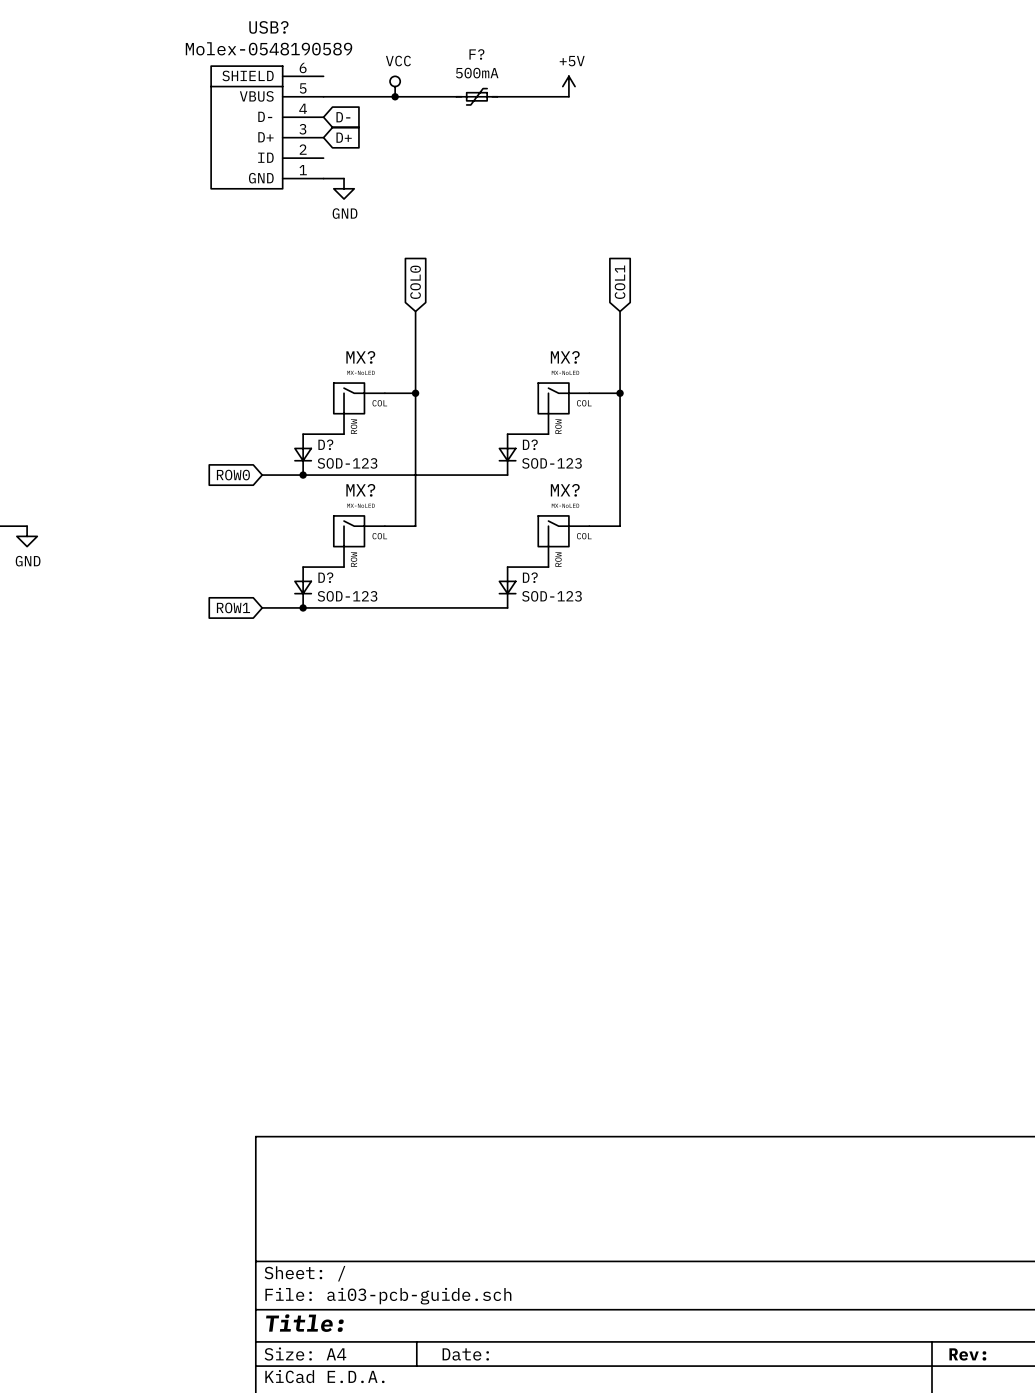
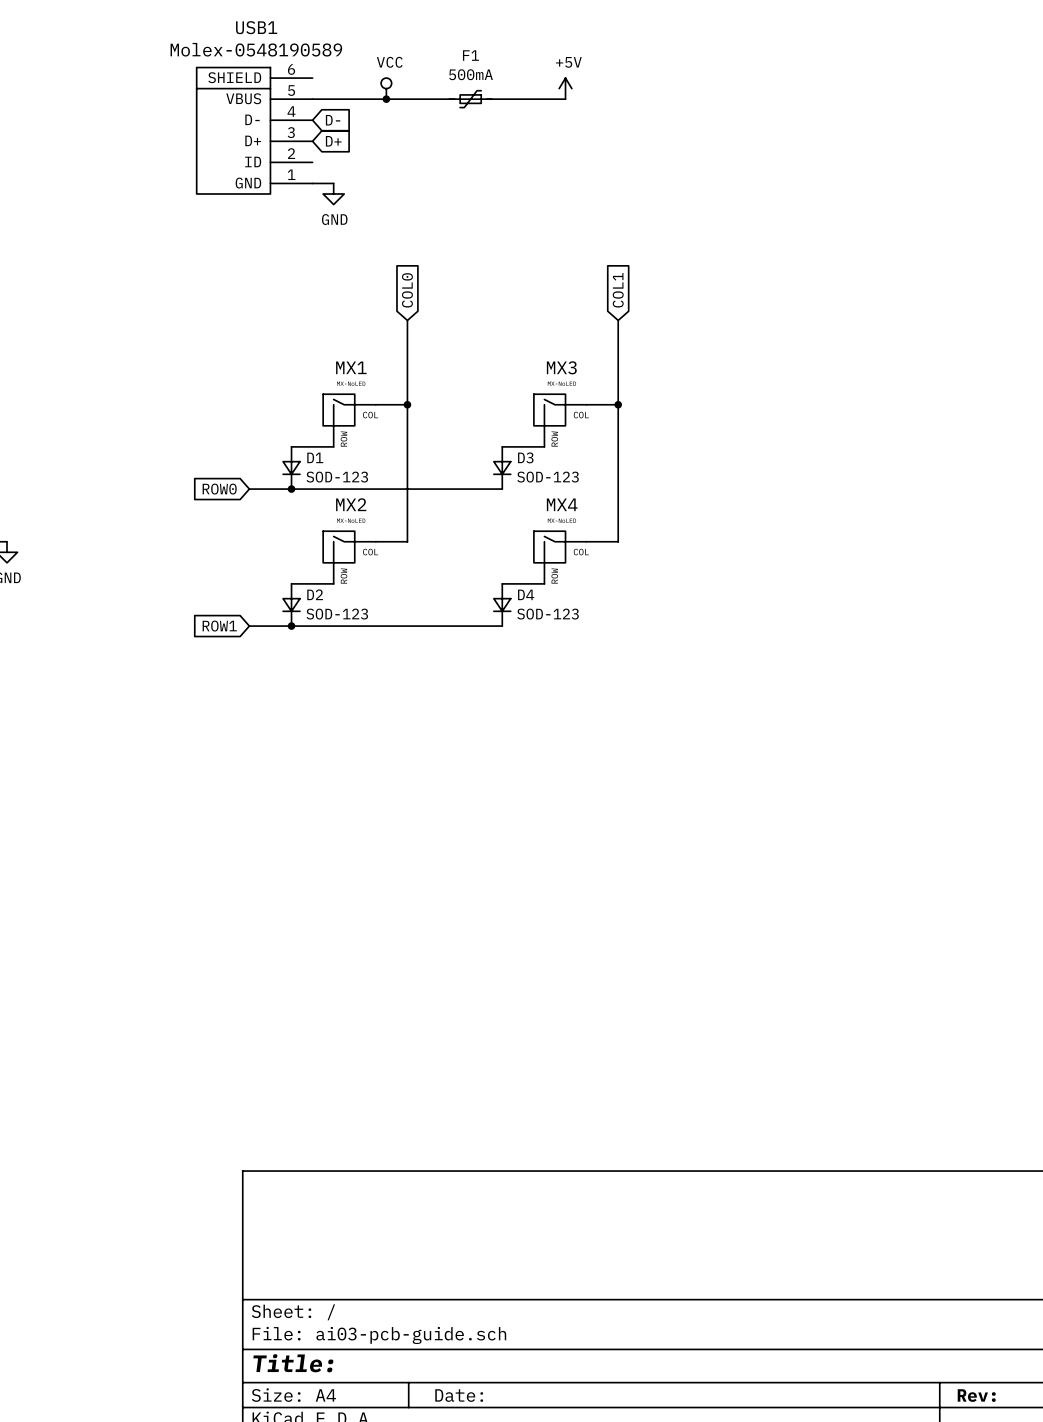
USB? name: USB? (268, 27) -> USB1 (256, 27)
F? name: F? (476, 54) -> F1 (471, 55)
MX? name: MX? (360, 357) -> MX1 (351, 367)
MX? name: MX? (565, 357) -> MX3 (561, 367)
D? name: D? (325, 444) -> D1 (315, 457)
D? name: D? (530, 444) -> D3 (525, 457)
MX? name: MX? (360, 490) -> MX2 (351, 504)
MX? name: MX? (565, 490) -> MX4 (562, 504)
D? name: D? (325, 577) -> D2 (315, 594)
D? name: D? (530, 577) -> D4 (526, 594)

